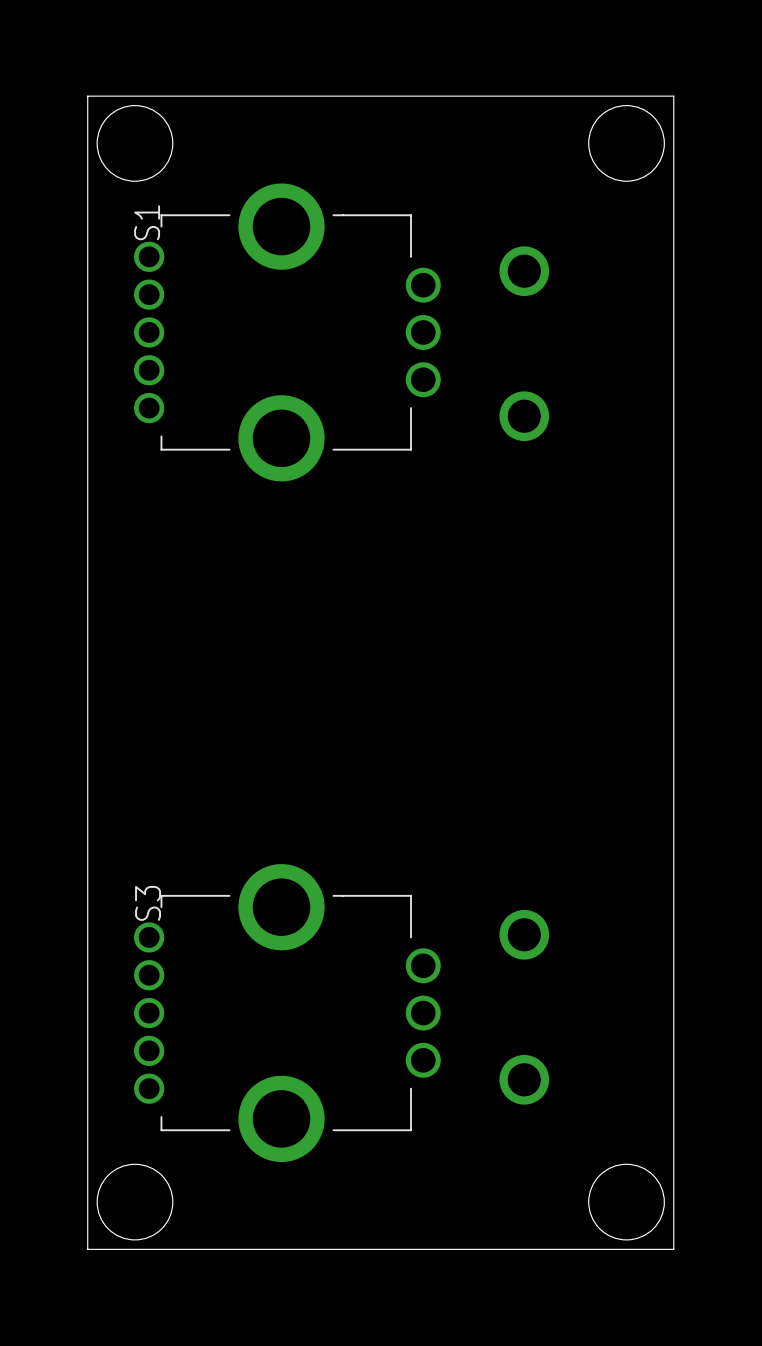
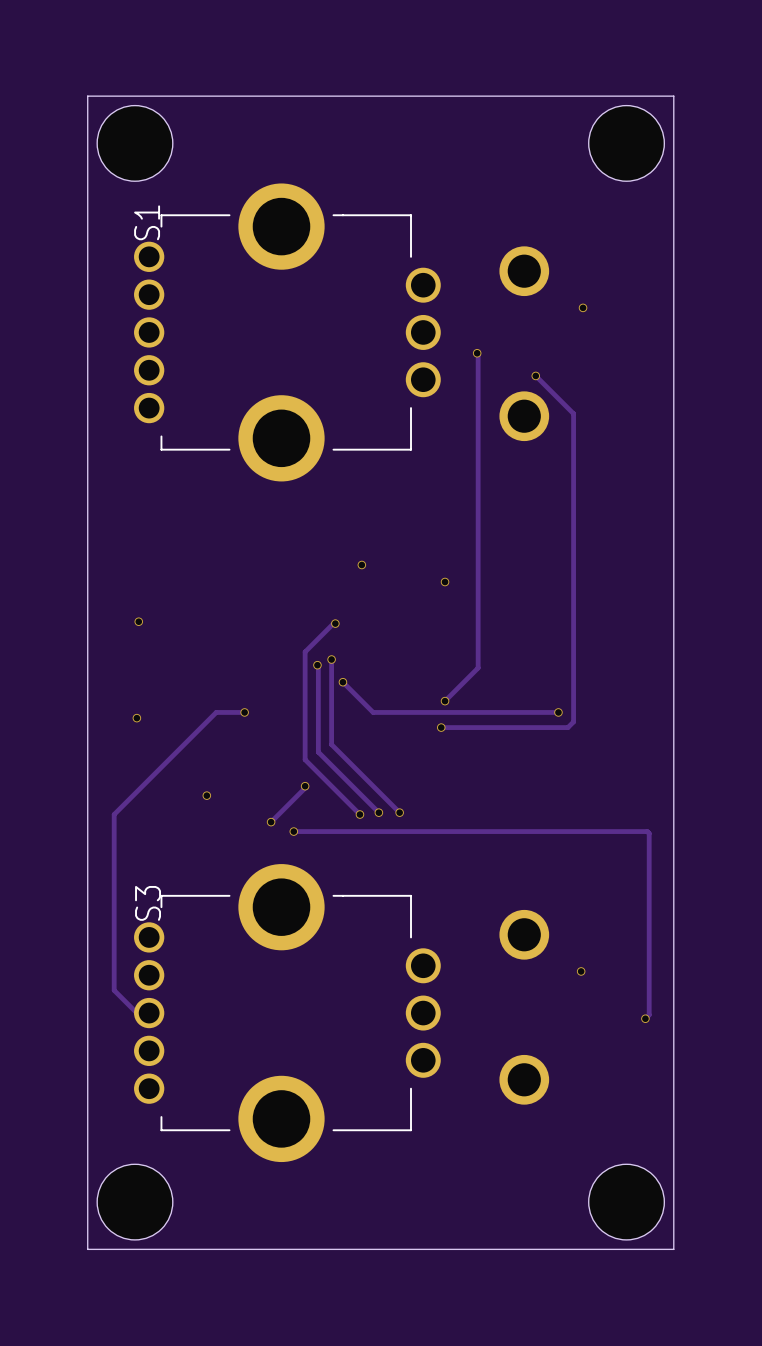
via: none -> (583, 307)
track: none -> (477, 353) (478, 667) (445, 701)
via: none -> (477, 353)
track: none -> (535, 375) (573, 413) (573, 721) (567, 727) (441, 727)
via: none -> (535, 375)
via: none -> (361, 564)
via: none -> (445, 582)
via: none -> (138, 621)
track: none -> (335, 623) (305, 651) (305, 759) (359, 814)
via: none -> (335, 623)
track: none -> (331, 659) (331, 744) (399, 812)
via: none -> (331, 659)
track: none -> (317, 665) (318, 752) (378, 812)
via: none -> (317, 665)
track: none -> (342, 682) (373, 712) (558, 712)
via: none -> (342, 682)
via: none -> (445, 701)
track: none -> (244, 712) (216, 712) (114, 814) (114, 990) (136, 1013) (149, 1013)
via: none -> (244, 712)
via: none -> (558, 712)
via: none -> (136, 718)
via: none -> (441, 727)
track: none -> (305, 786) (271, 822)
via: none -> (305, 786)
via: none -> (206, 795)
via: none -> (378, 812)
via: none -> (399, 812)
via: none -> (359, 814)
via: none -> (271, 822)
track: none -> (293, 831) (647, 831) (649, 833) (649, 1014) (645, 1018)
via: none -> (293, 831)
via: none -> (581, 971)
via: none -> (645, 1018)

